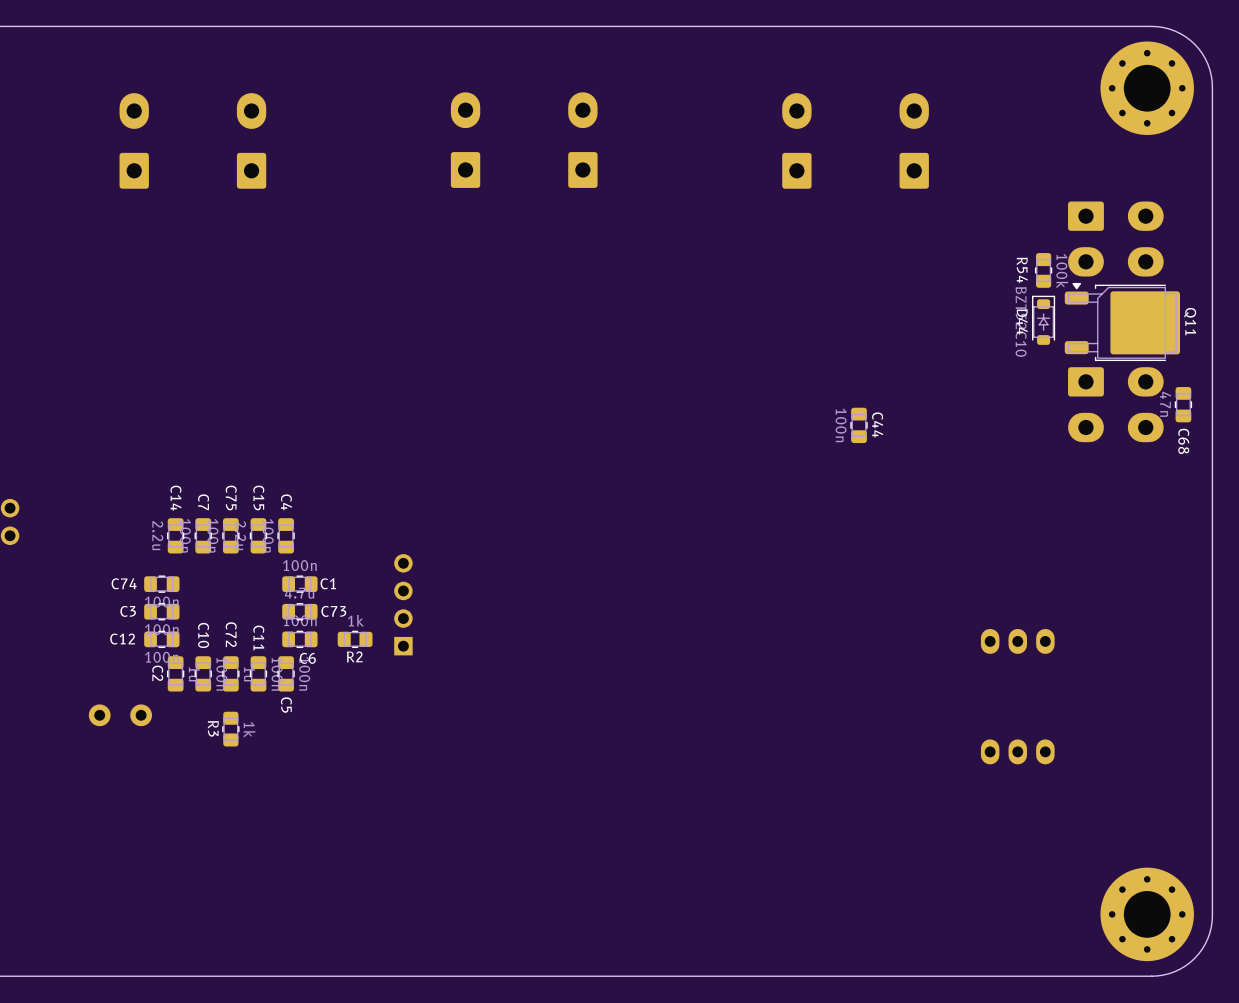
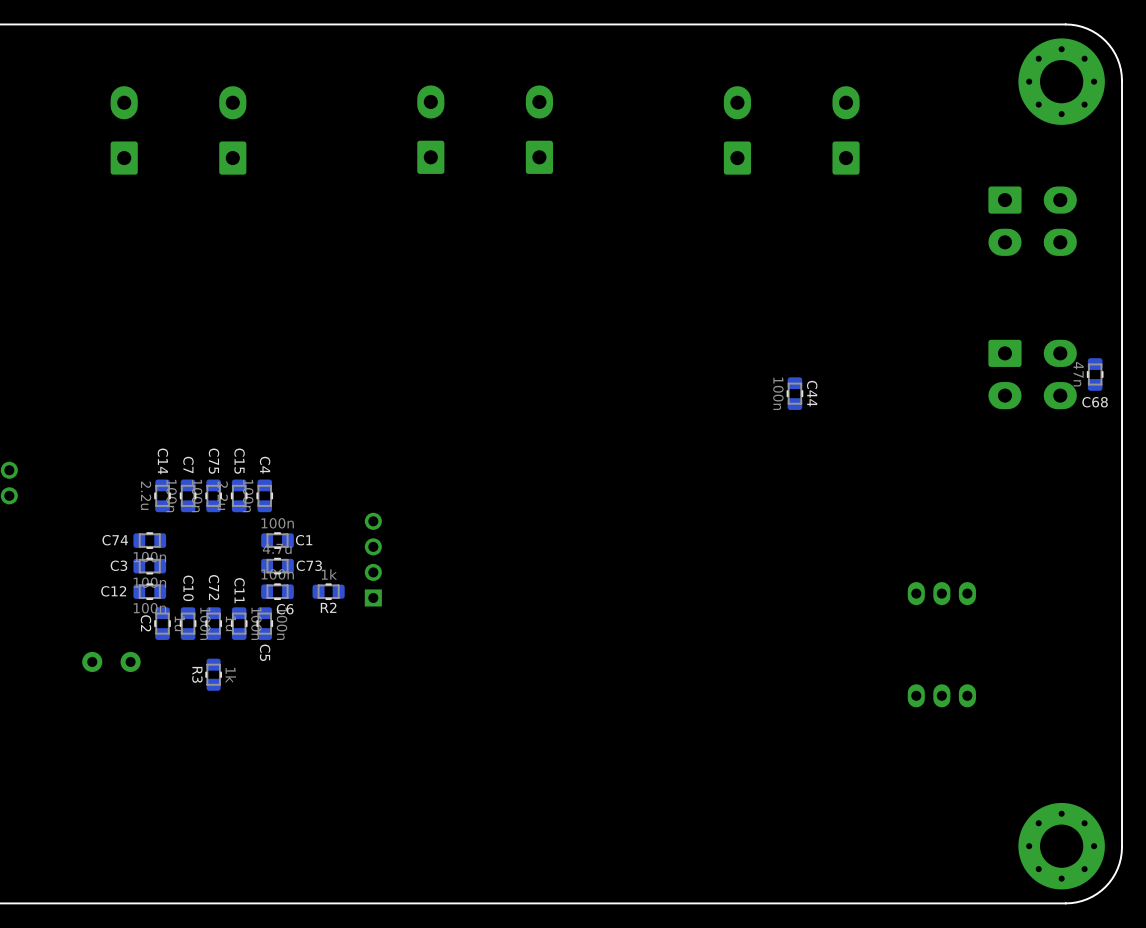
R54: 100k (1043, 270) -> none
D44: BZT52C10 (1043, 320) -> none
Q11: (1122, 321) -> none
C68 name rotation: 0° (1183, 441) -> 90° counterclockwise (1095, 402)

